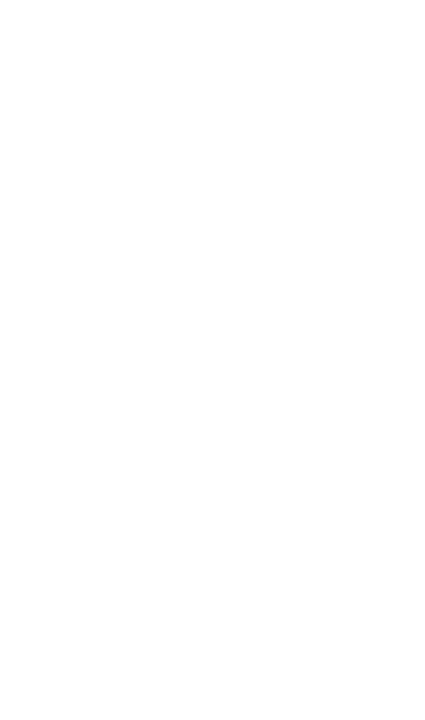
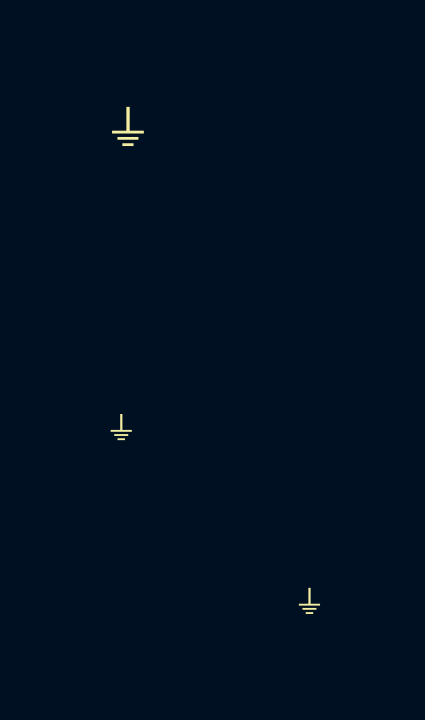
text: none -> ⏚ (127, 126)
text: none -> ⏚ (121, 427)
text: none -> ⏚ (309, 600)

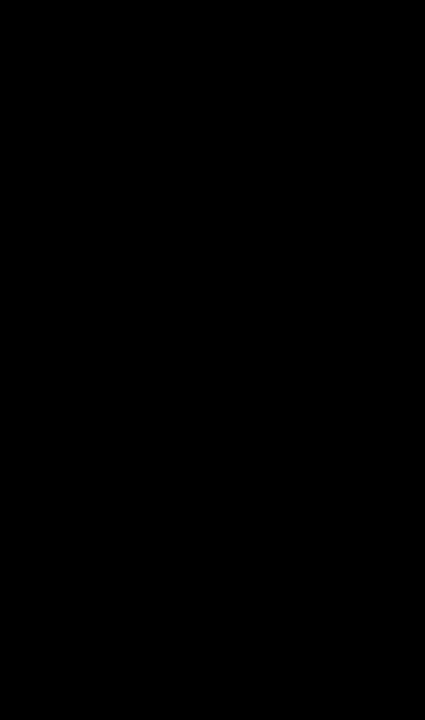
text: ⏚ (127, 126) -> none
text: ⏚ (121, 427) -> none
text: ⏚ (309, 600) -> none

